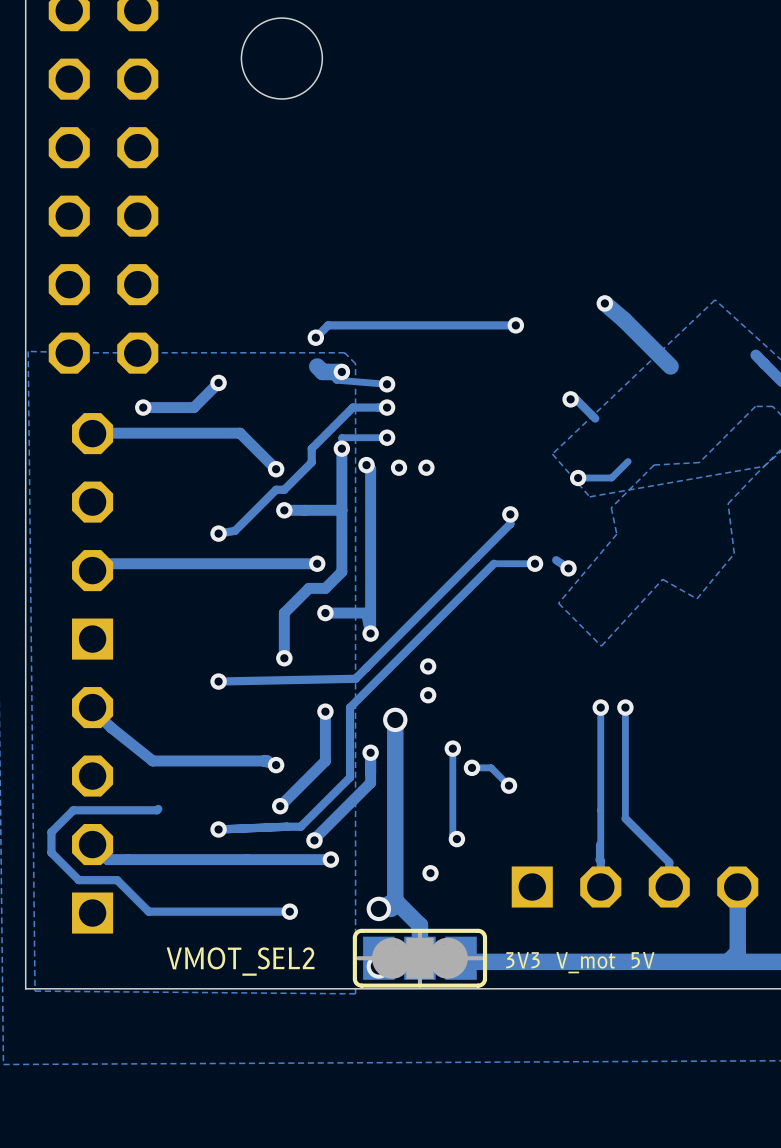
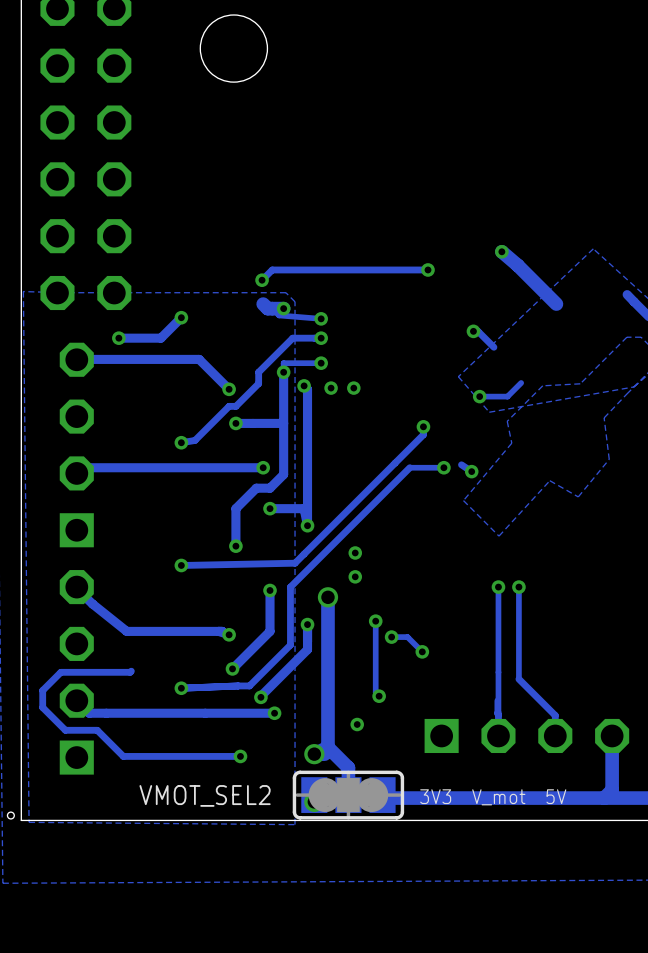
hole: none -> (10, 815)

